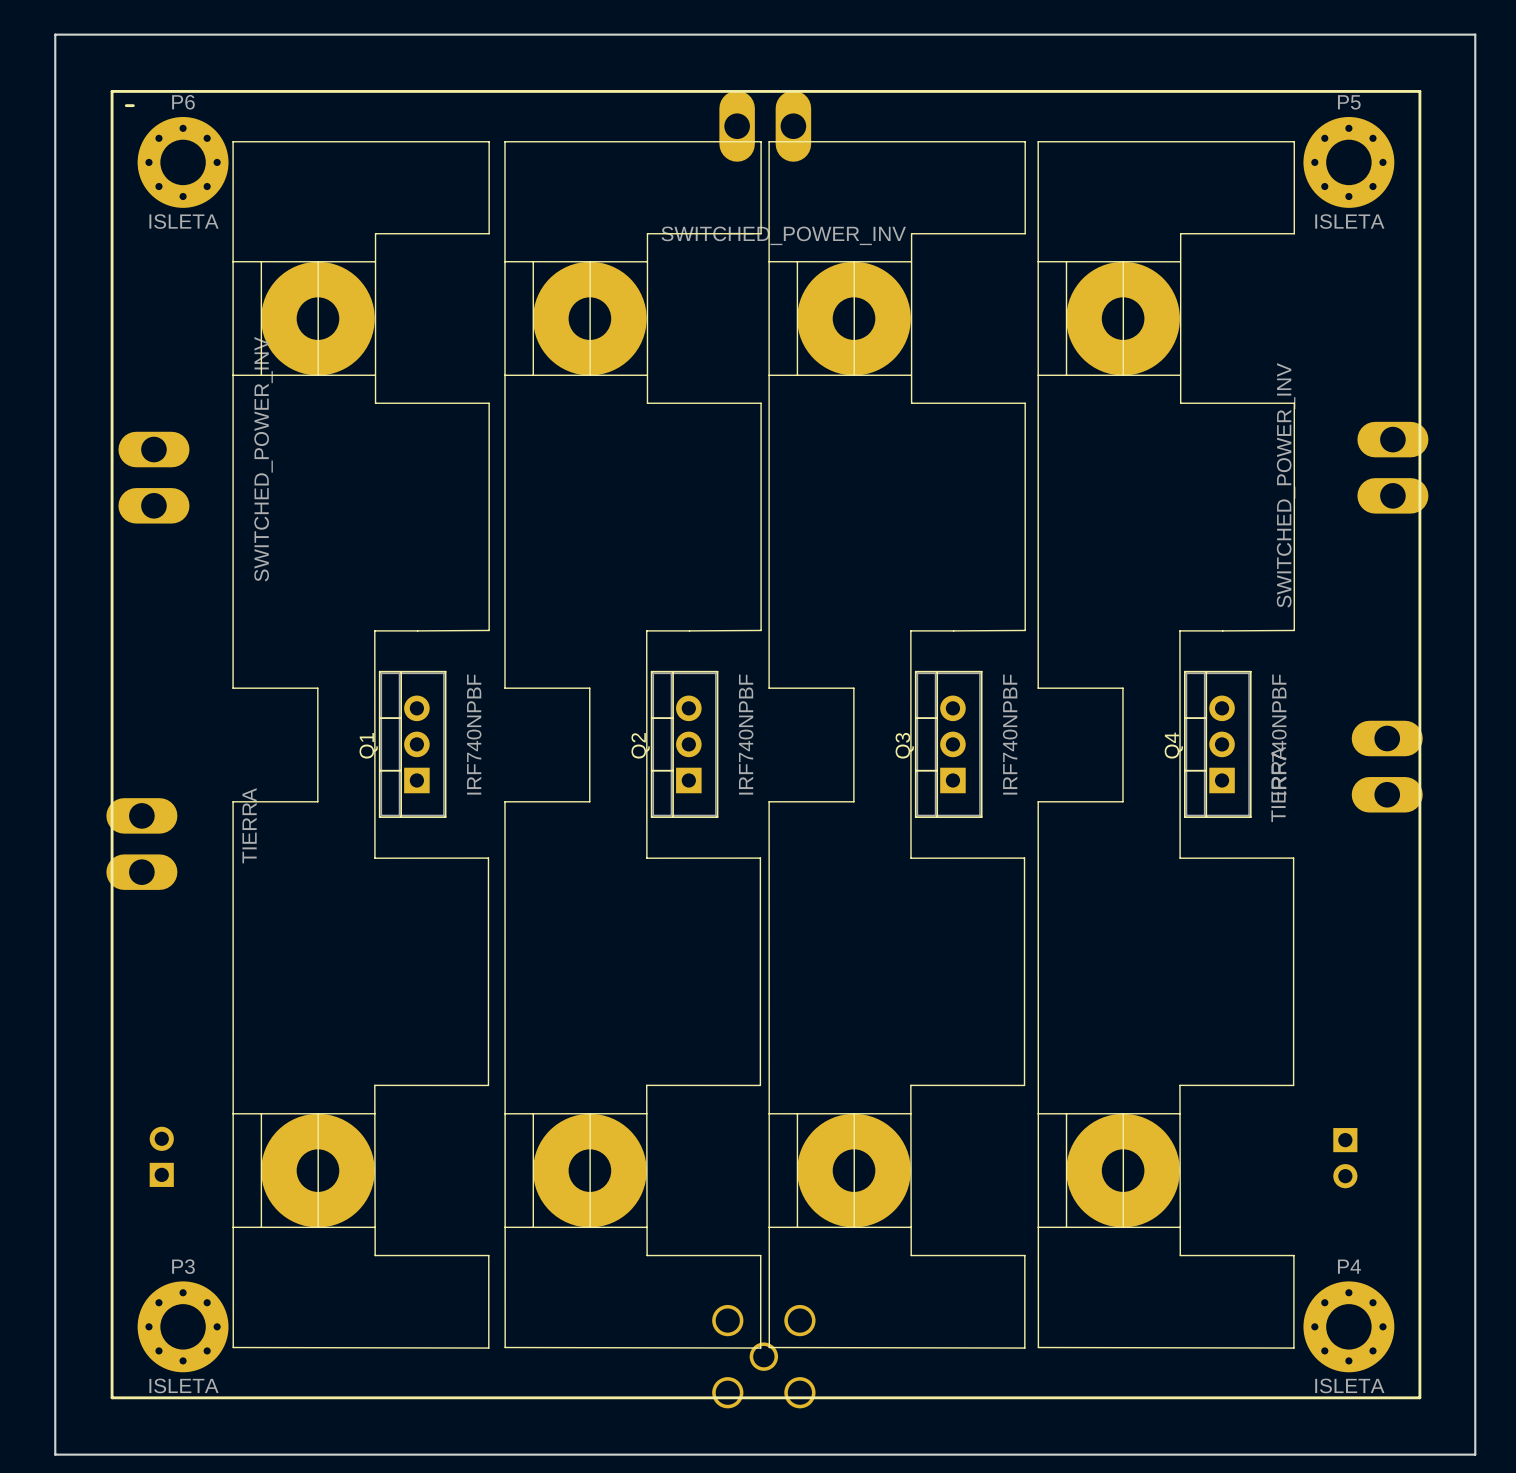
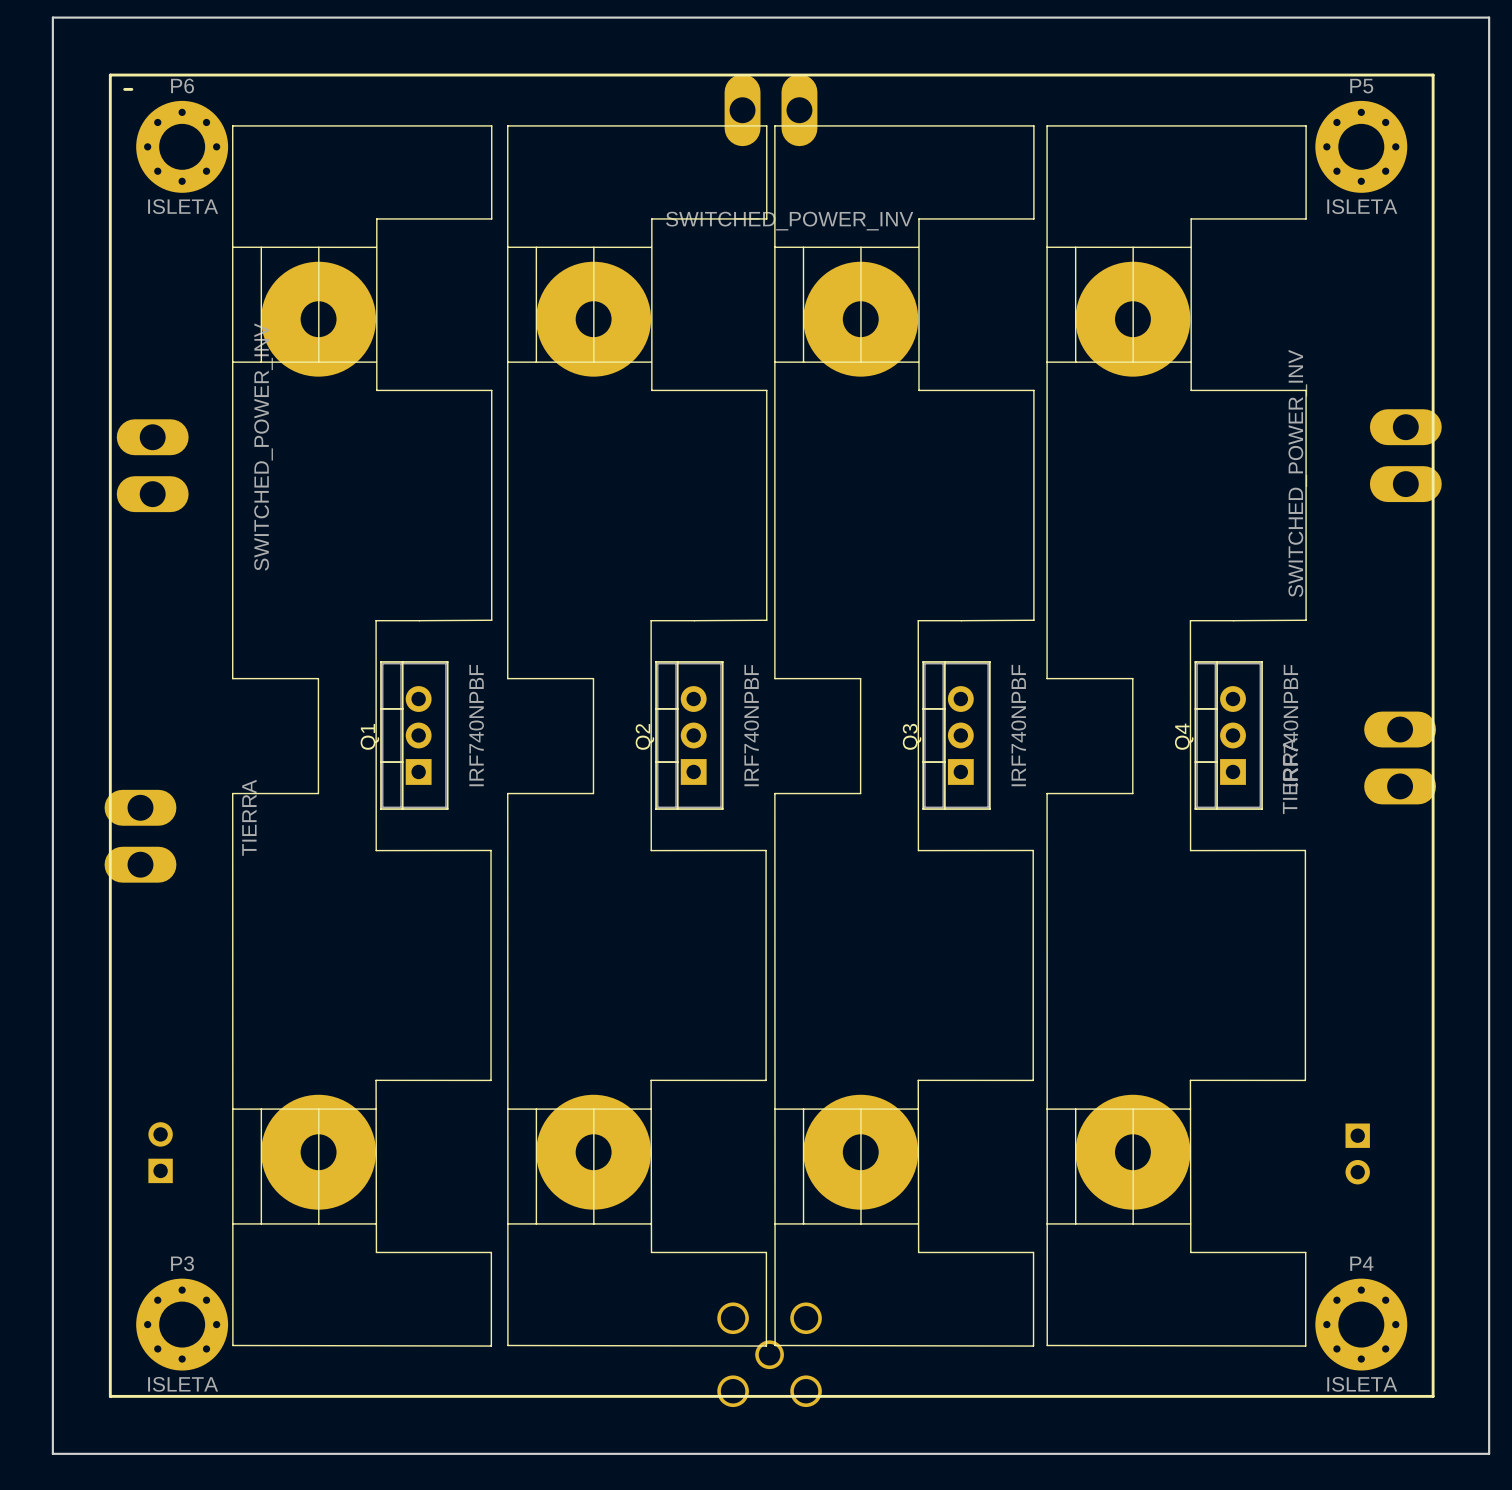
Q1 footprint: [232, 141, 490, 1349] -> [232, 125, 492, 1347]
Q2 footprint: [504, 141, 762, 1349] -> [507, 125, 767, 1347]
Q3 footprint: [768, 141, 1026, 1349] -> [774, 125, 1035, 1347]
Q4 footprint: [1037, 141, 1295, 1349] -> [1046, 125, 1307, 1347]

